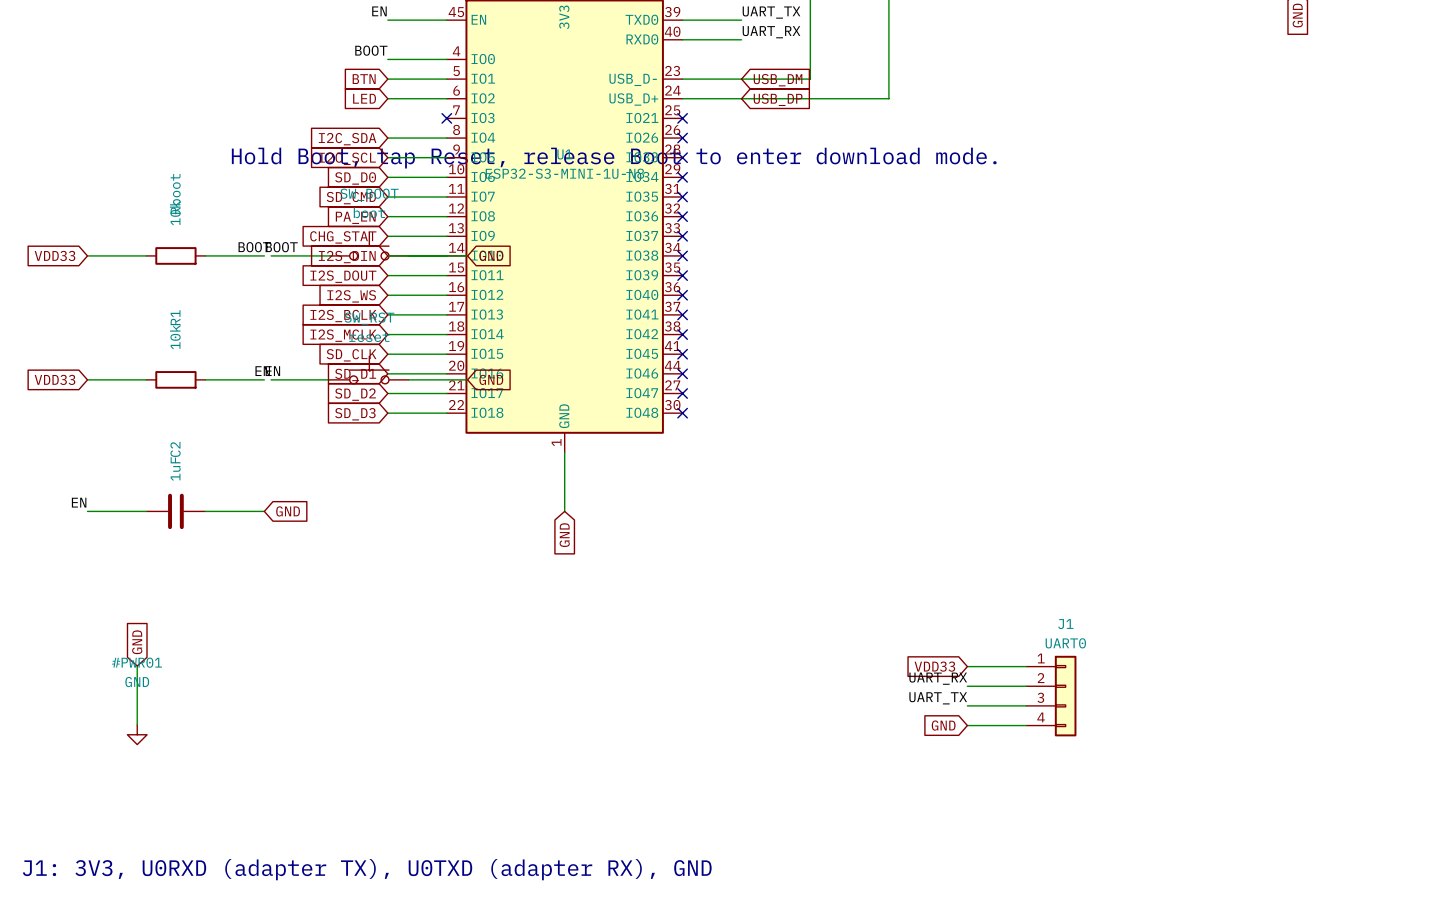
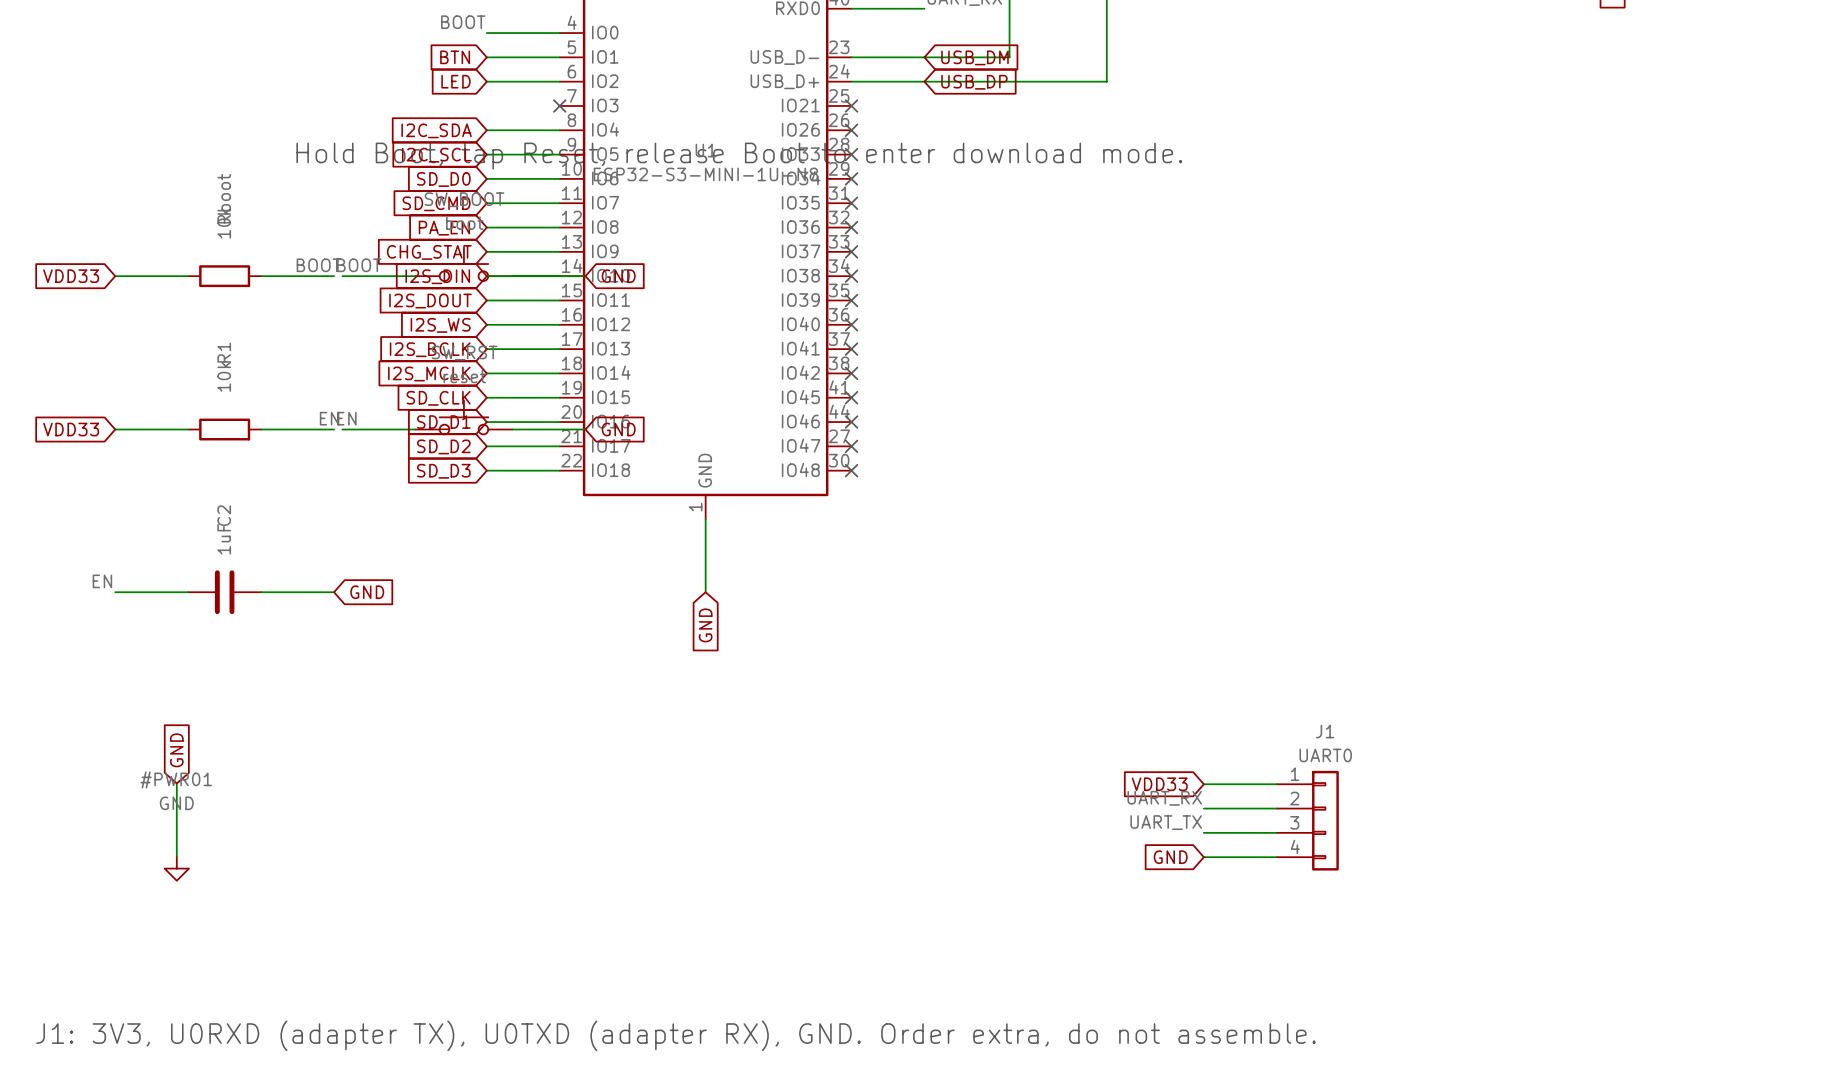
text: J1: 3V3, U0RXD (adapter TX), U0TXD (adapter RX), GND (367, 869) -> J1: 3V3, U0RXD (adapter TX), U0TXD (adapter RX), GND. Order extra, do not assemble. (675, 1035)

